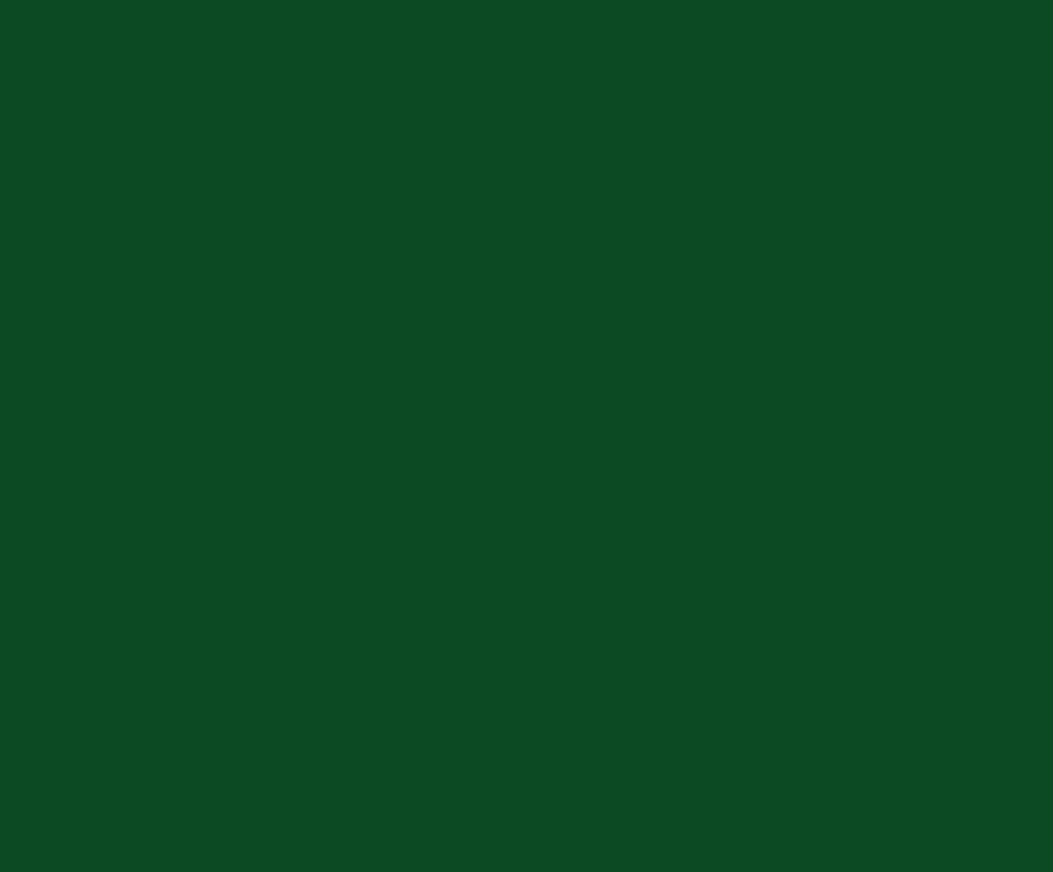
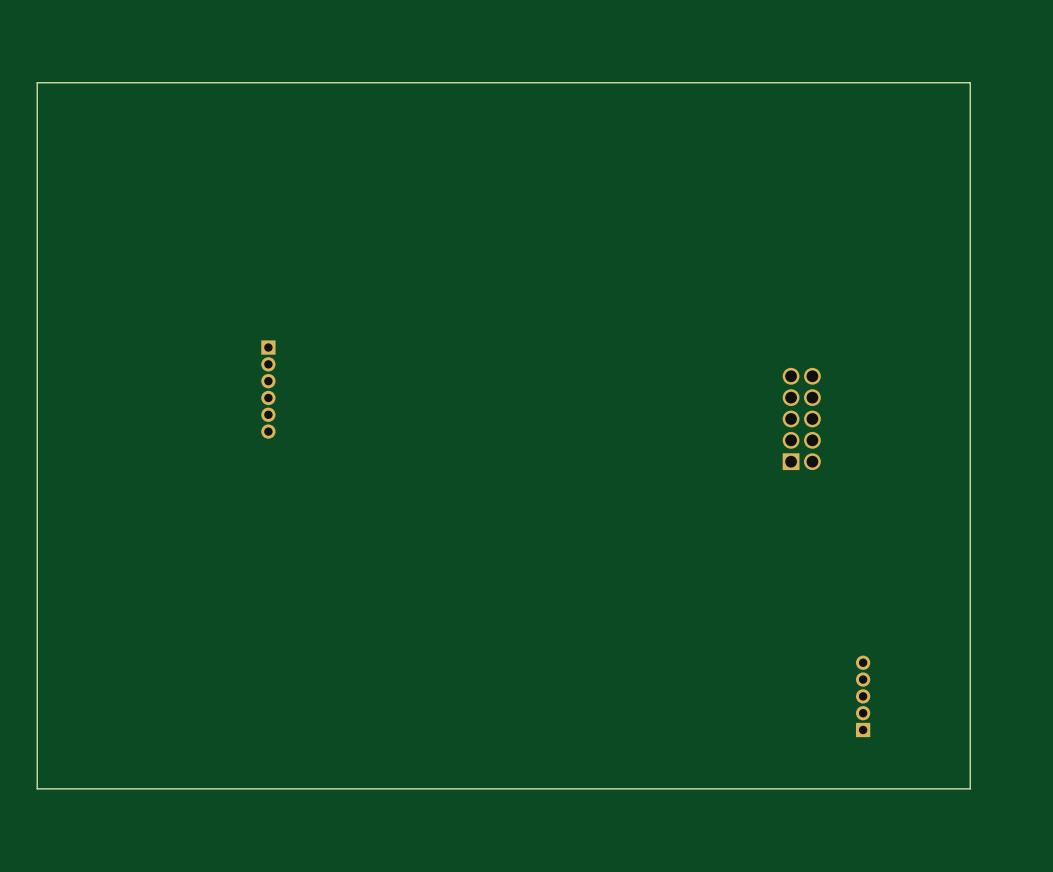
board edge: none -> (970, 82) (37, 82) (37, 788) (970, 788) (970, 82)
part: none -> (268, 389)
part: none -> (801, 418)
part: none -> (863, 696)

